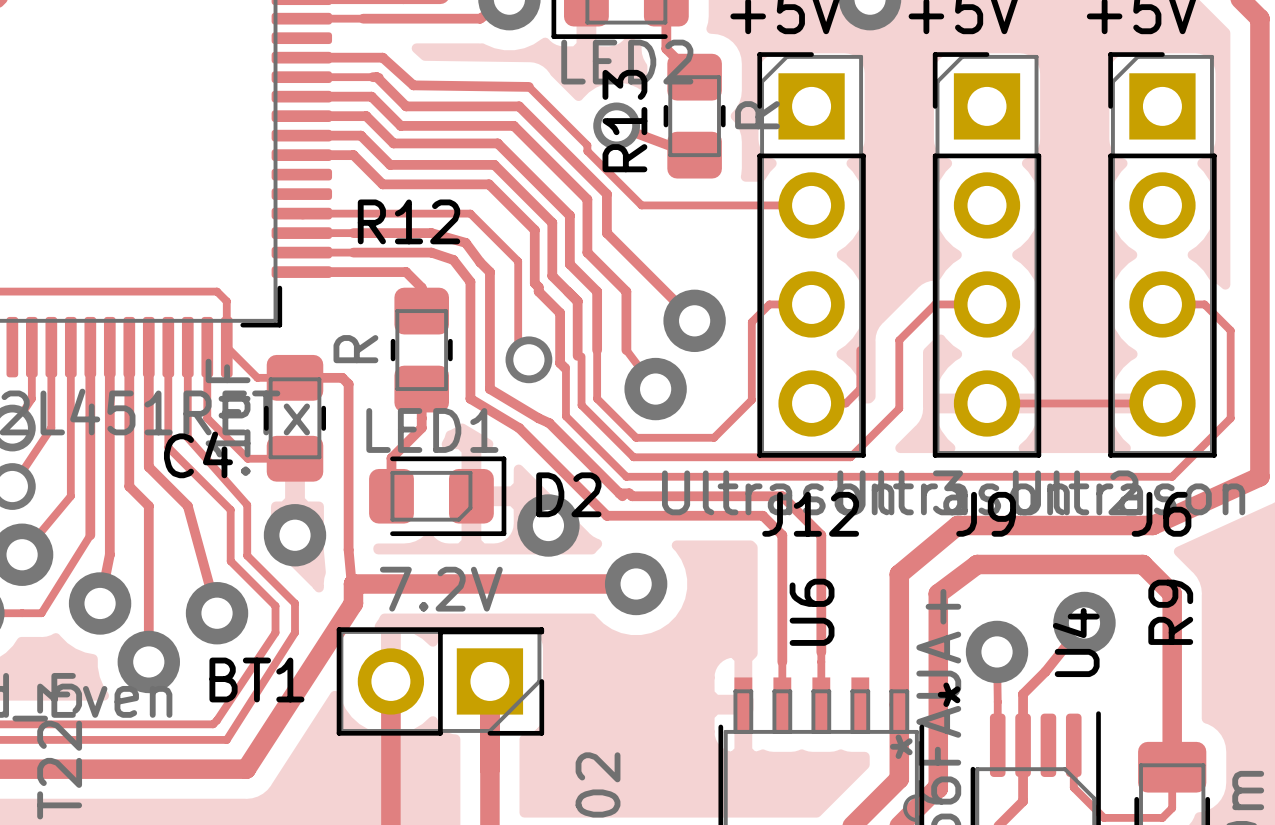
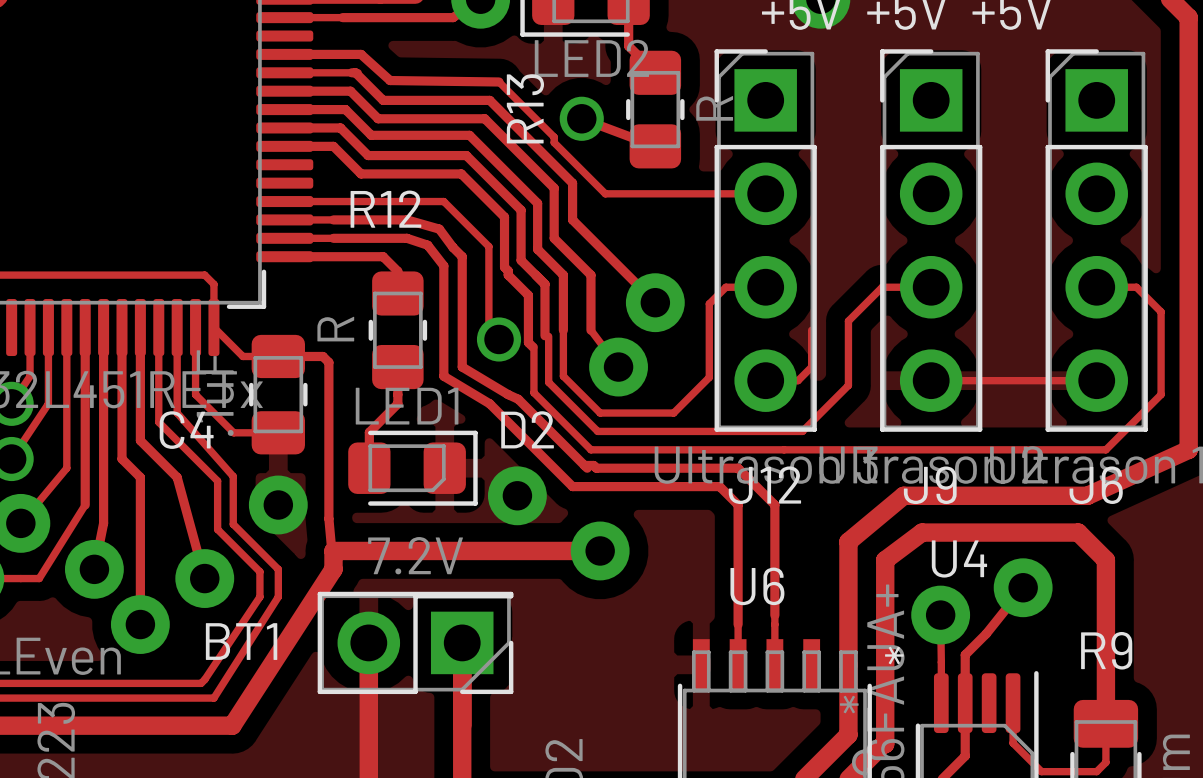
R13 name position: R13 (624, 121) -> R13 (525, 108)
D2 name position: D2 (568, 494) -> D2 (527, 429)
U6 name rotation: 0° (812, 612) -> 90° clockwise (757, 586)
R9 name rotation: 0° (1170, 612) -> 90° clockwise (1106, 650)
U4 name rotation: 0° (1076, 642) -> 90° clockwise (959, 558)

